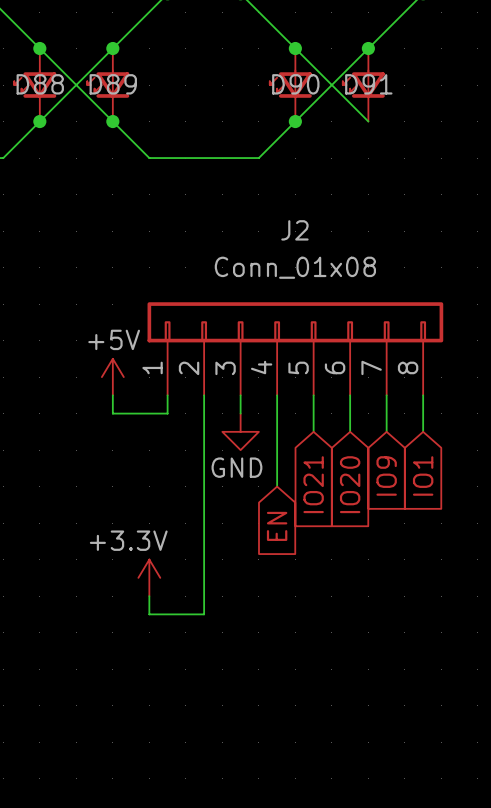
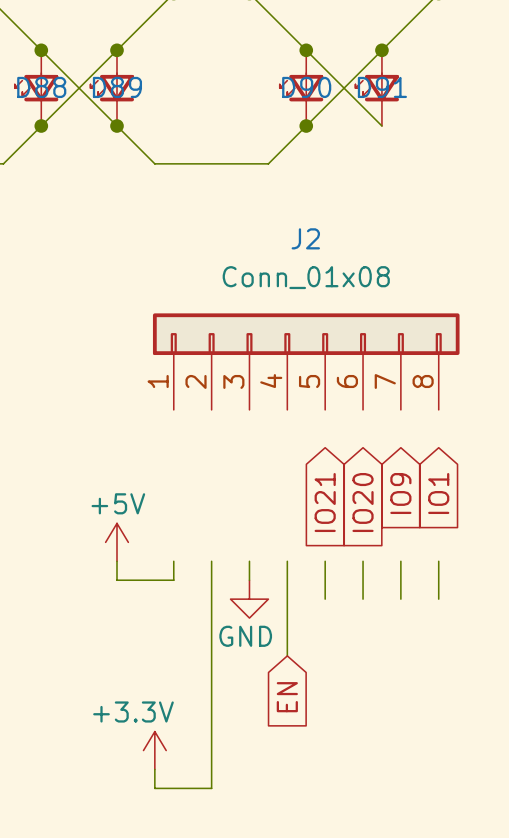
power symbol position: +5V (112, 377) -> +5V (116, 542)
wire: (112, 395) (112, 413) (167, 413) (167, 395) -> (116, 561) (116, 580) (173, 580) (173, 561)
wire: (204, 395) (204, 541) -> none
wire: (240, 395) (240, 413) -> (249, 561) (249, 580)
wire: (277, 395) (277, 486) -> (287, 561) (287, 655)
wire: (313, 395) (313, 431) -> (325, 561) (325, 599)
wire: (350, 395) (350, 431) -> (363, 561) (363, 599)
wire: (386, 395) (386, 431) -> (400, 561) (400, 599)
wire: (423, 395) (423, 431) -> (438, 561) (438, 599)
power symbol position: GND (240, 431) -> GND (249, 599)
global label position: EN (277, 526) -> EN (287, 697)
power symbol position: +3.3V (149, 577) -> +3.3V (154, 750)
wire: (149, 596) (149, 614) (204, 614) -> (154, 769) (154, 788) (211, 788) (211, 636)

